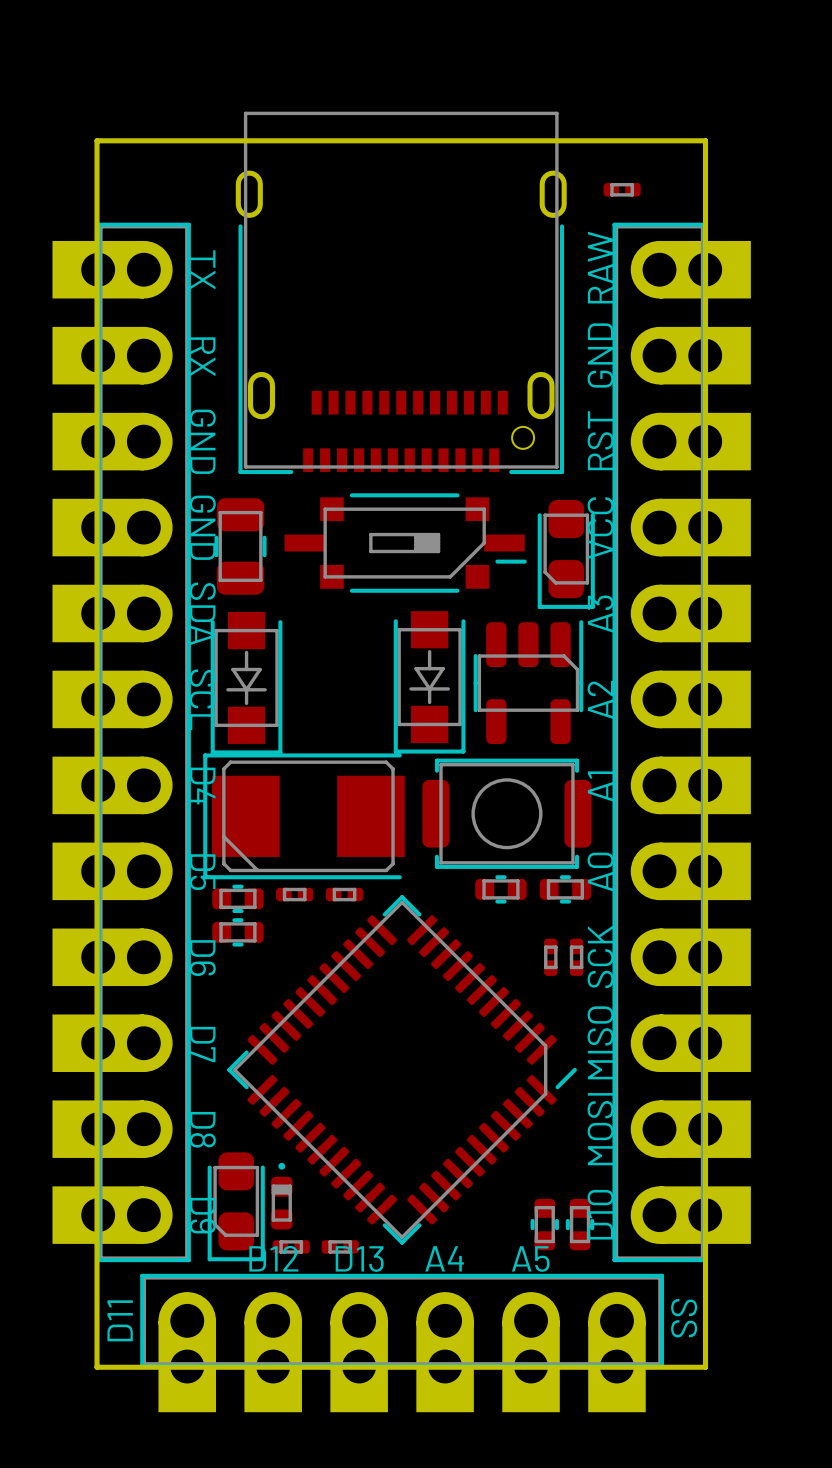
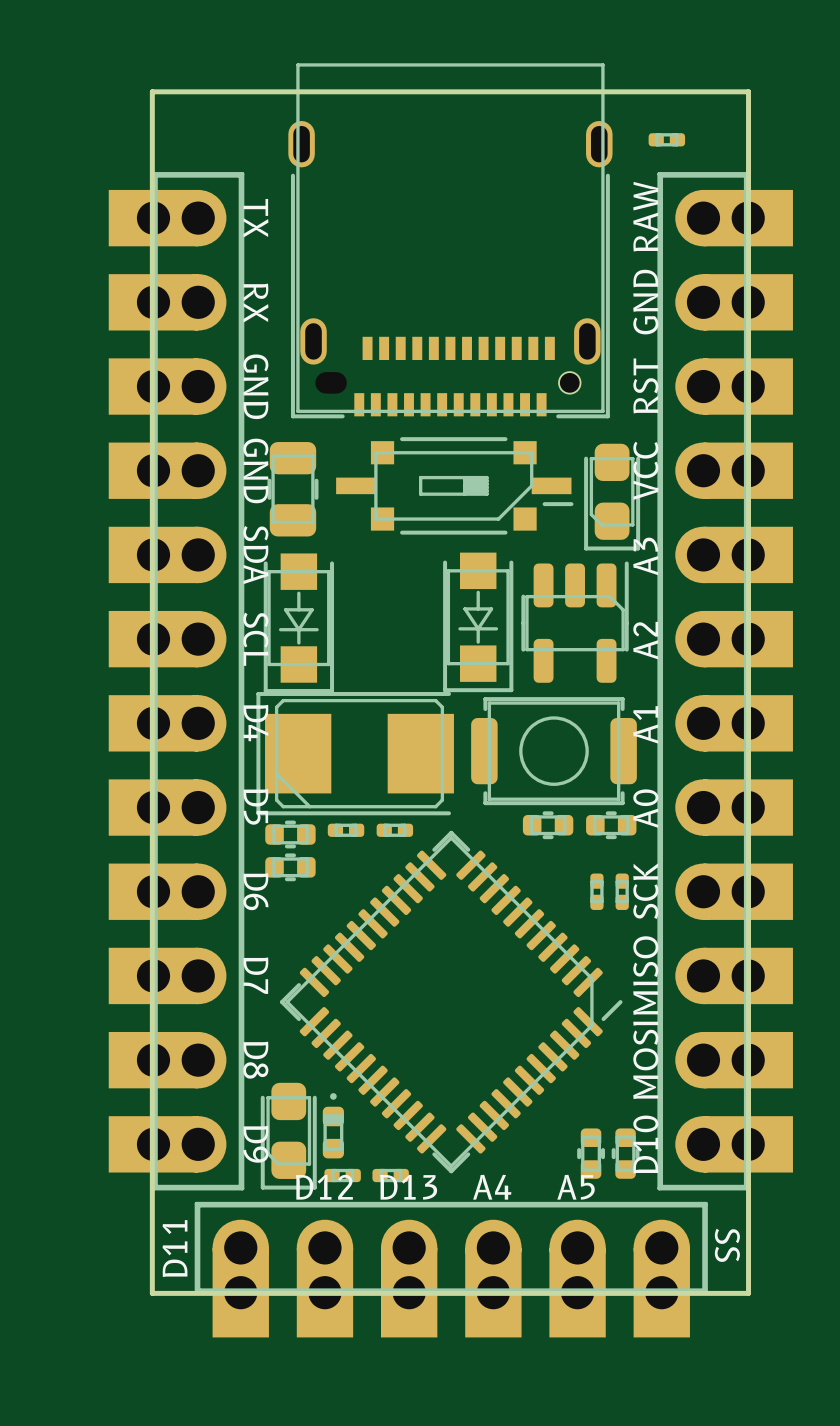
part footprint: [235, 111, 567, 475] -> [288, 63, 613, 419]
part footprint: [52, 222, 191, 1263] -> [108, 172, 245, 1191]
part footprint: [612, 222, 751, 1263] -> [657, 172, 793, 1191]
part footprint: [284, 493, 527, 593] -> [336, 437, 574, 535]
part footprint: [214, 498, 267, 595] -> [267, 442, 319, 537]
part footprint: [537, 499, 595, 609] -> [584, 443, 641, 551]
part footprint: [210, 611, 283, 755] -> [263, 553, 335, 694]
part footprint: [393, 611, 466, 754] -> [443, 552, 514, 693]
part footprint: [473, 620, 584, 745] -> [521, 561, 629, 683]
part footprint: [203, 753, 405, 880] -> [256, 691, 454, 816]
part footprint: [422, 758, 592, 869] -> [471, 697, 637, 806]
part footprint: [475, 875, 527, 904] -> [522, 811, 574, 840]
part footprint: [539, 875, 592, 904] -> [586, 811, 637, 840]
part footprint: [212, 884, 264, 914] -> [265, 820, 316, 849]
part footprint: [227, 895, 577, 1245] -> [280, 830, 623, 1174]
part footprint: [212, 918, 264, 947] -> [265, 853, 316, 882]
part footprint: [207, 1152, 265, 1262] -> [260, 1082, 317, 1190]
part footprint: [270, 1162, 293, 1230] -> [322, 1093, 345, 1159]
part footprint: [530, 1198, 560, 1251] -> [577, 1128, 605, 1179]
part footprint: [565, 1198, 595, 1251] -> [611, 1128, 640, 1179]
part footprint: [140, 1273, 665, 1413] -> [194, 1201, 708, 1338]

